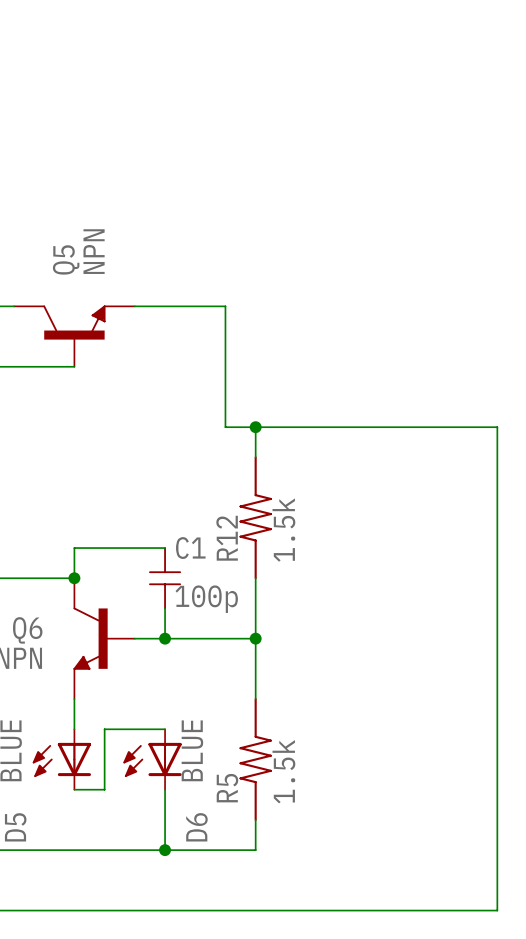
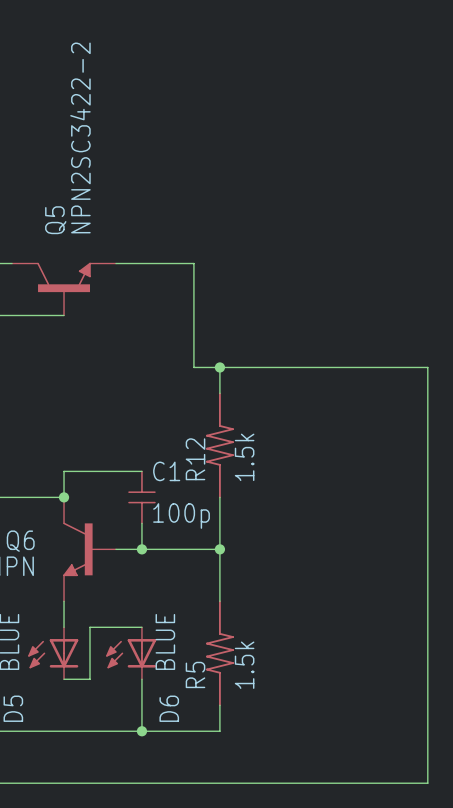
Q5 value: NPN (94, 251) -> NPN2SC3422-2 (80, 137)

